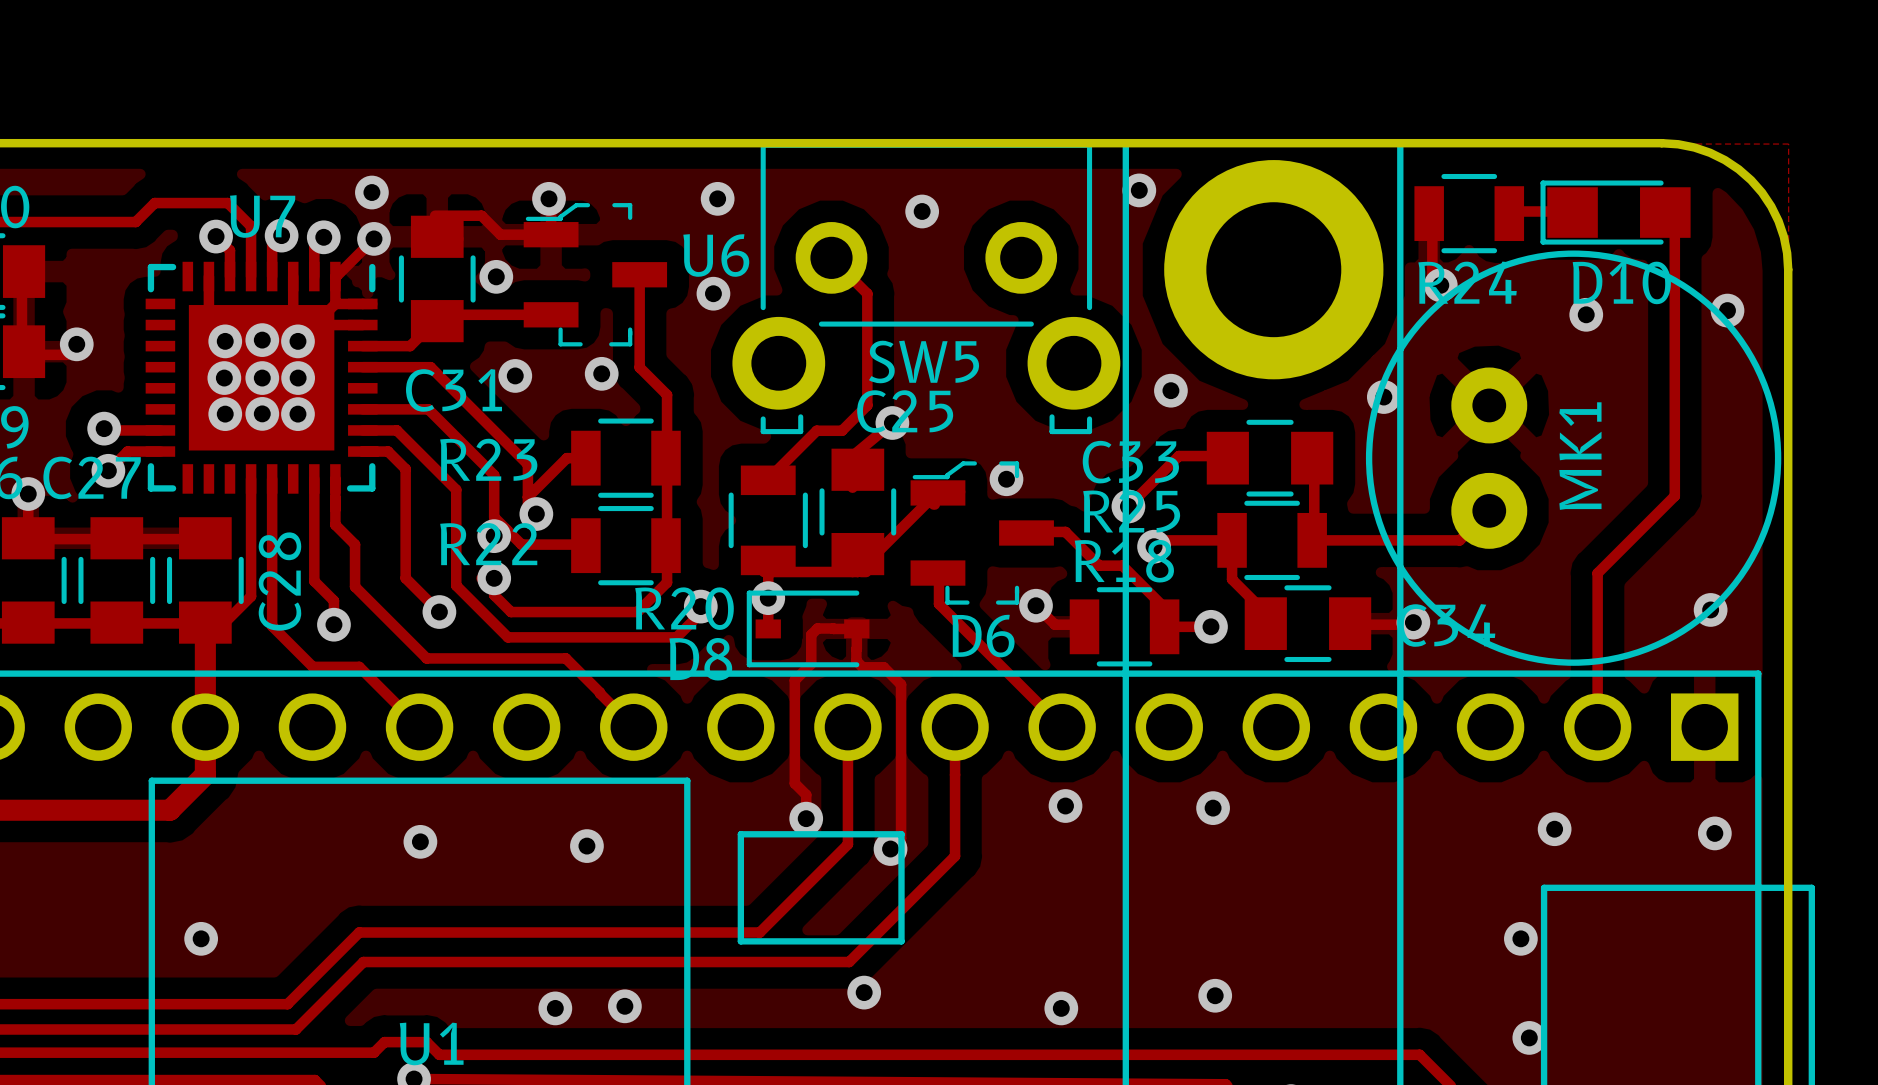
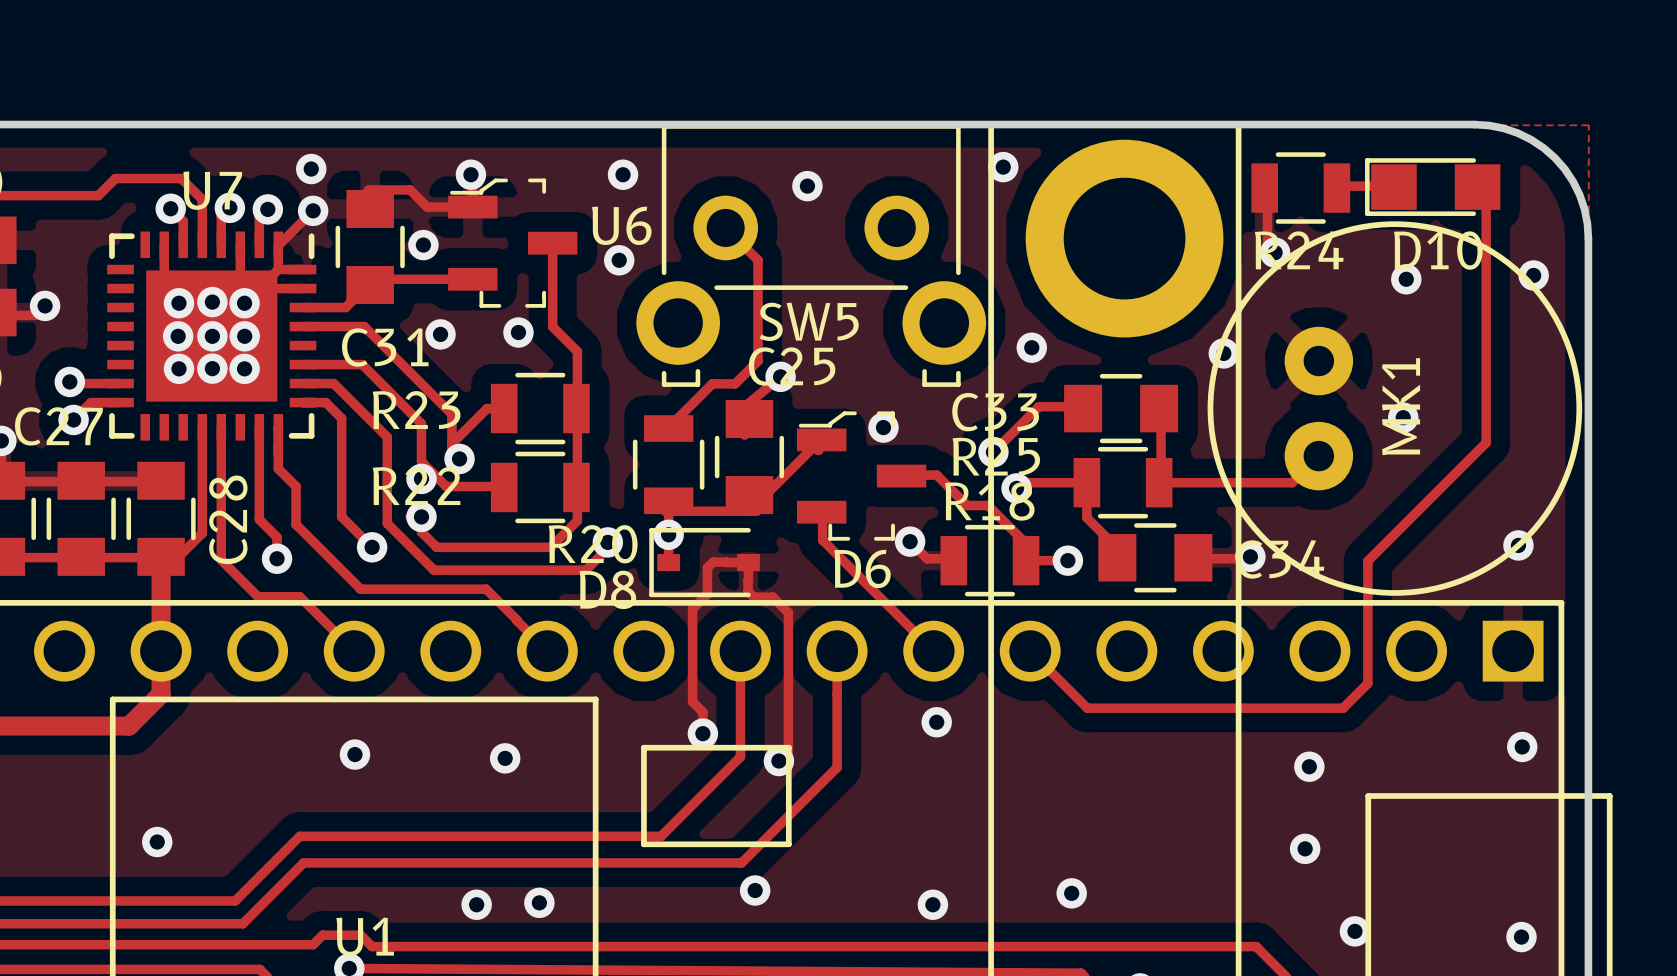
via: none -> (1403, 417)
track: (1597, 573) (1597, 727) -> (1416, 512) (1367, 561) (1367, 683) (1343, 708) (1087, 708) (1030, 651)
via: (1213, 808) -> none
via: (1554, 829) -> none
via: none -> (1309, 766)
via: (1520, 938) -> none
via: none -> (1305, 848)
via: none -> (1521, 937)

